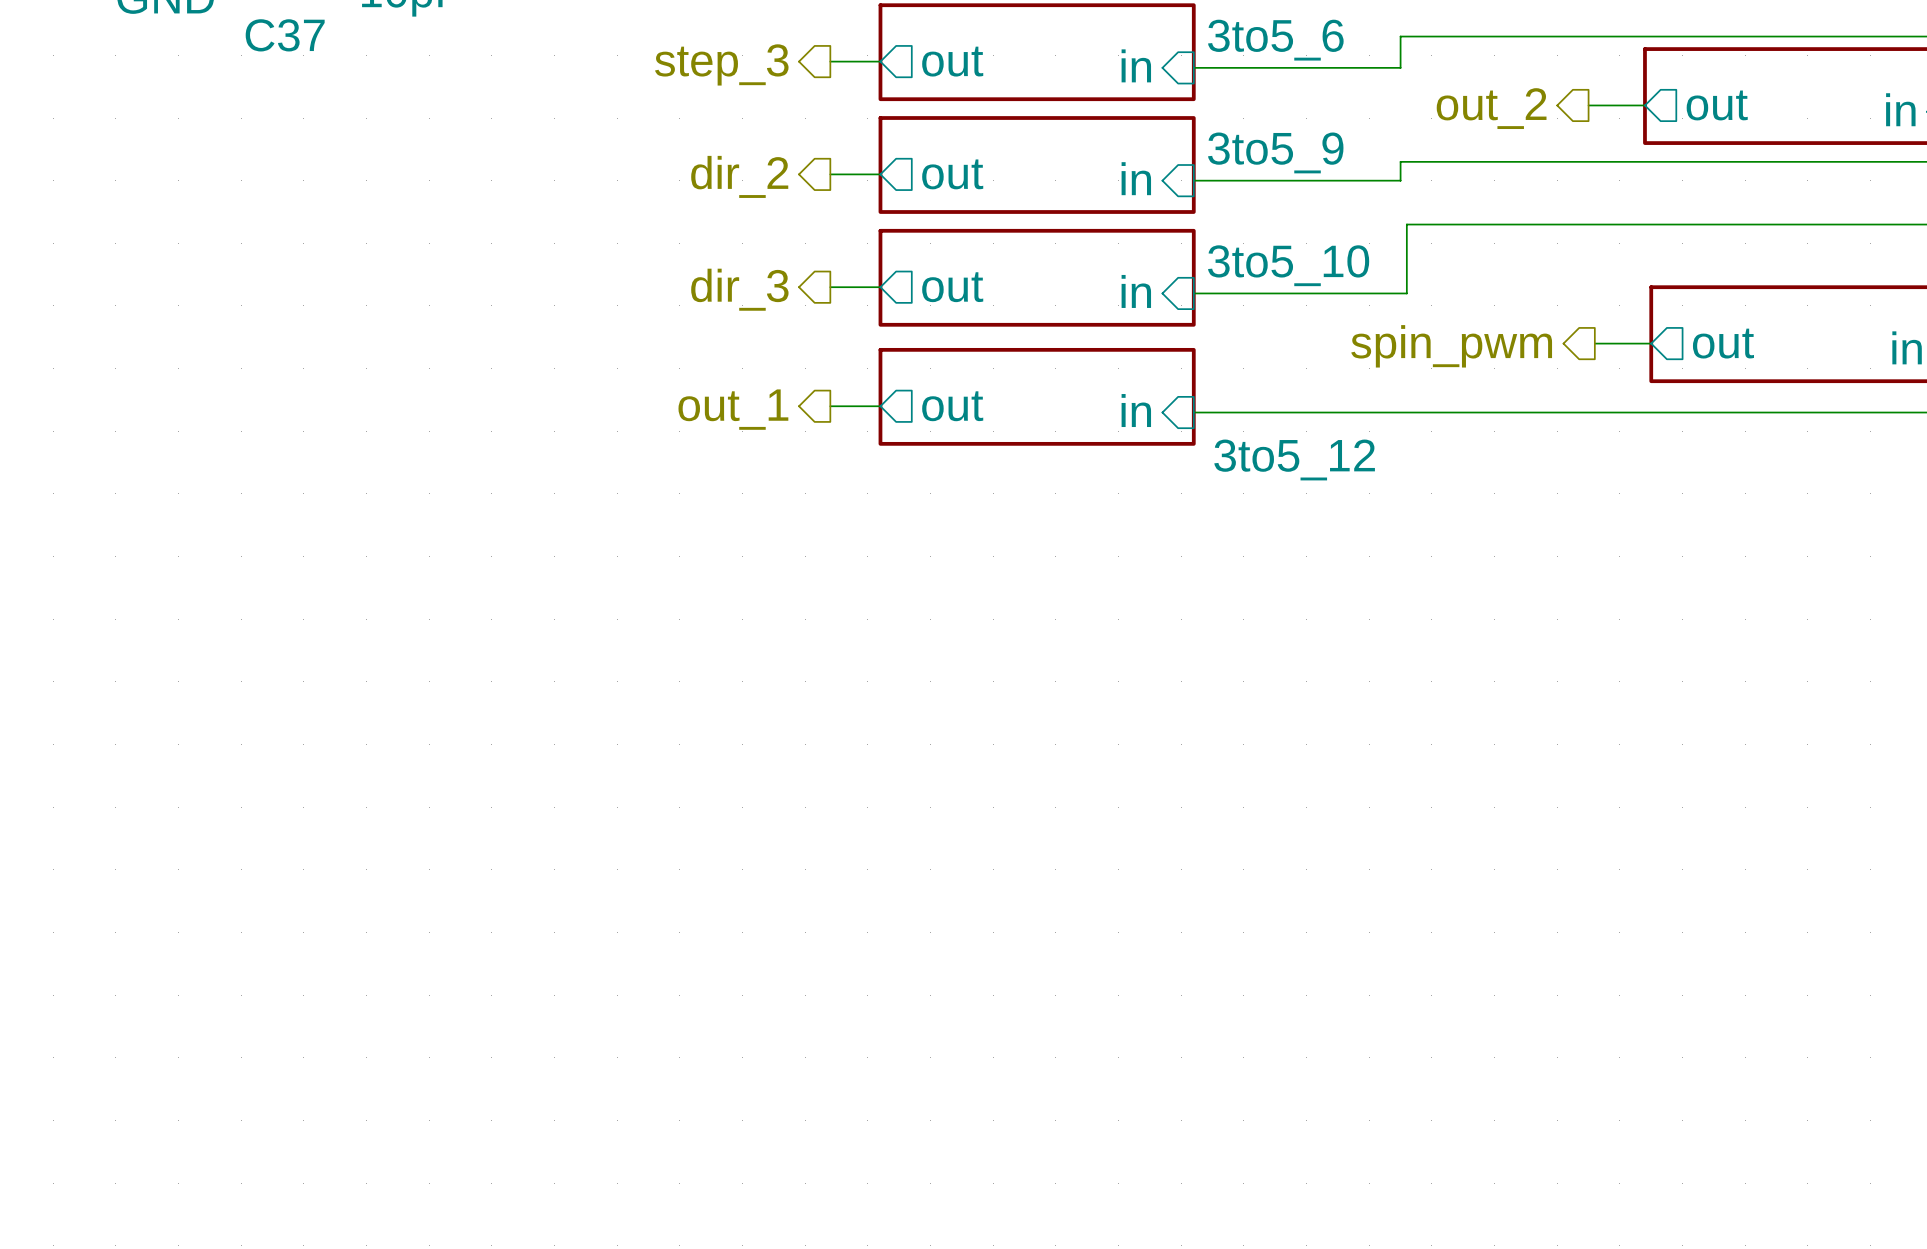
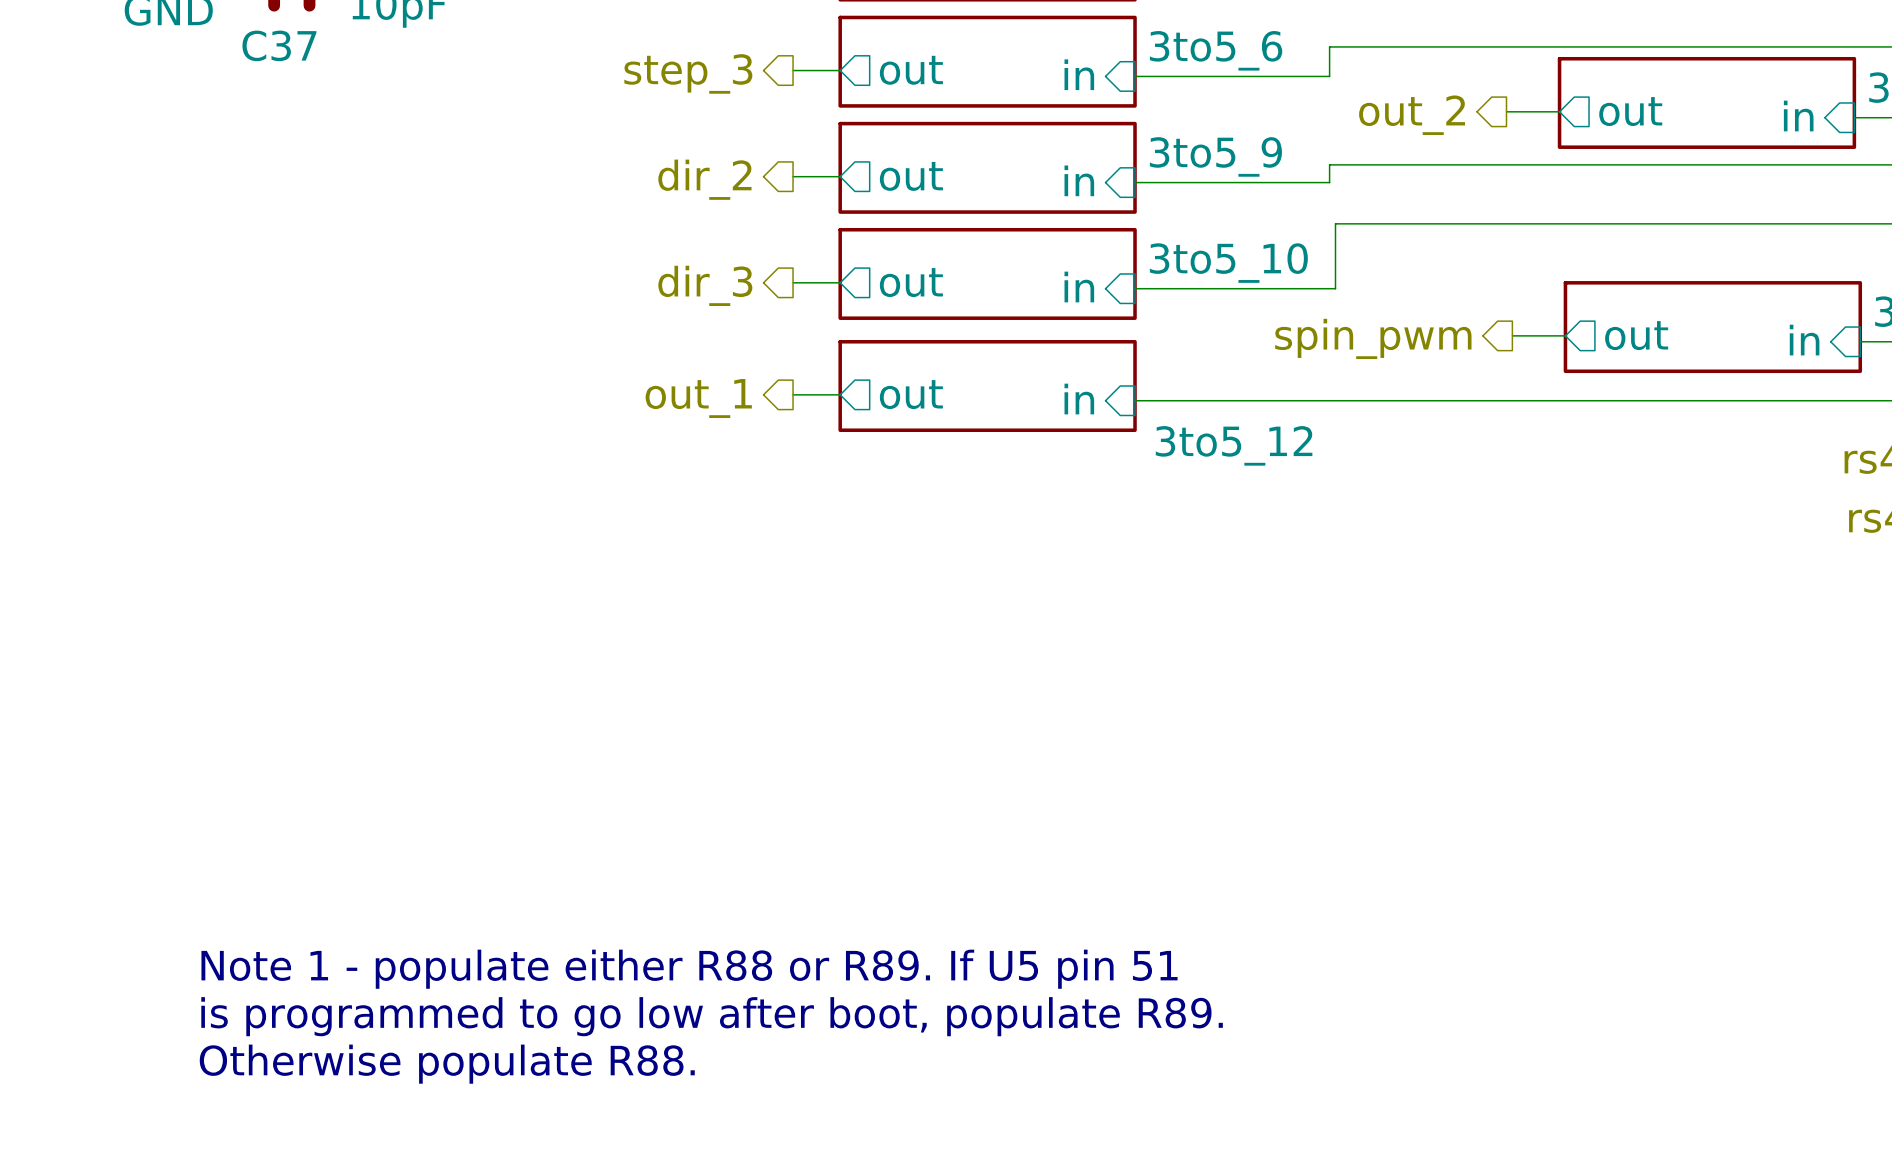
text: none -> Note 1 - populate either R88 or R89. If U5 pin 51 (689, 969)
text: none -> is programmed to go low after boot, populate R89. (712, 1016)
text: none -> Otherwise populate R88. (447, 1064)

